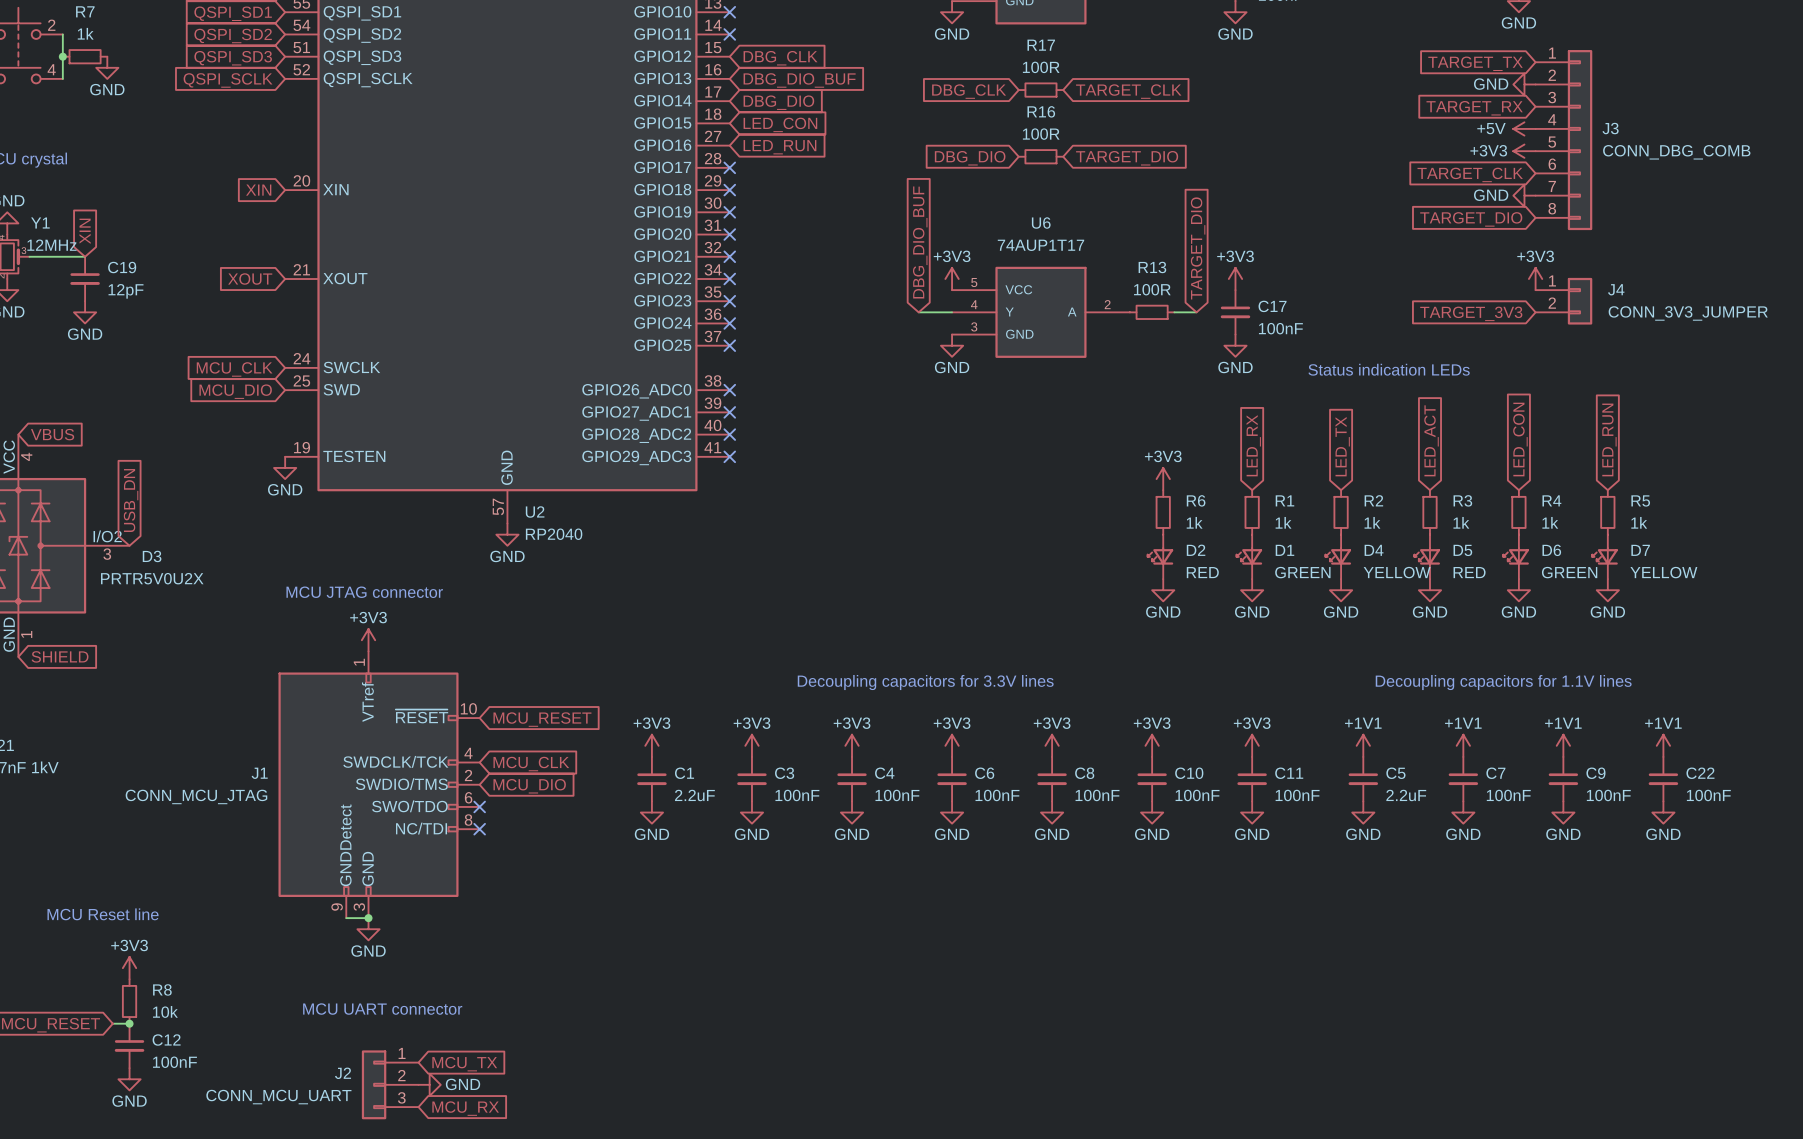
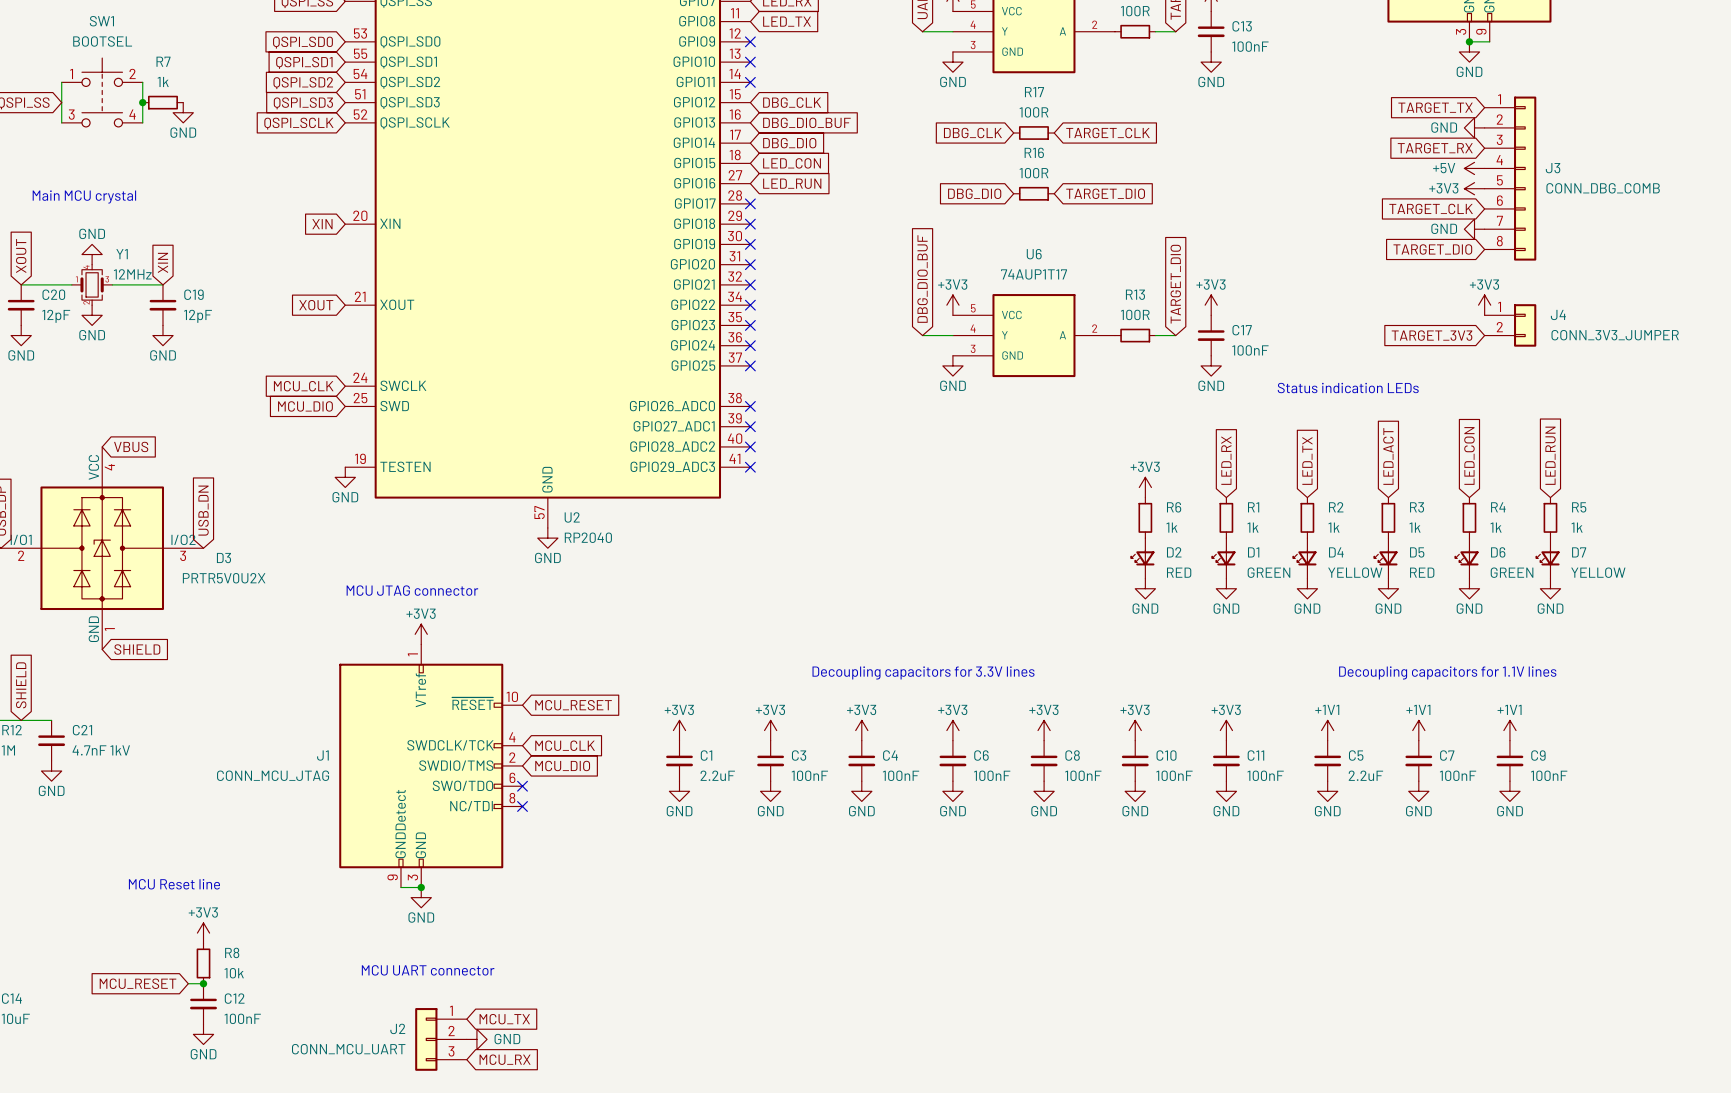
power symbol: +1V1 (1663, 745) -> none
C22: 100nF (1663, 779) -> none
power symbol: GND (1663, 812) -> none

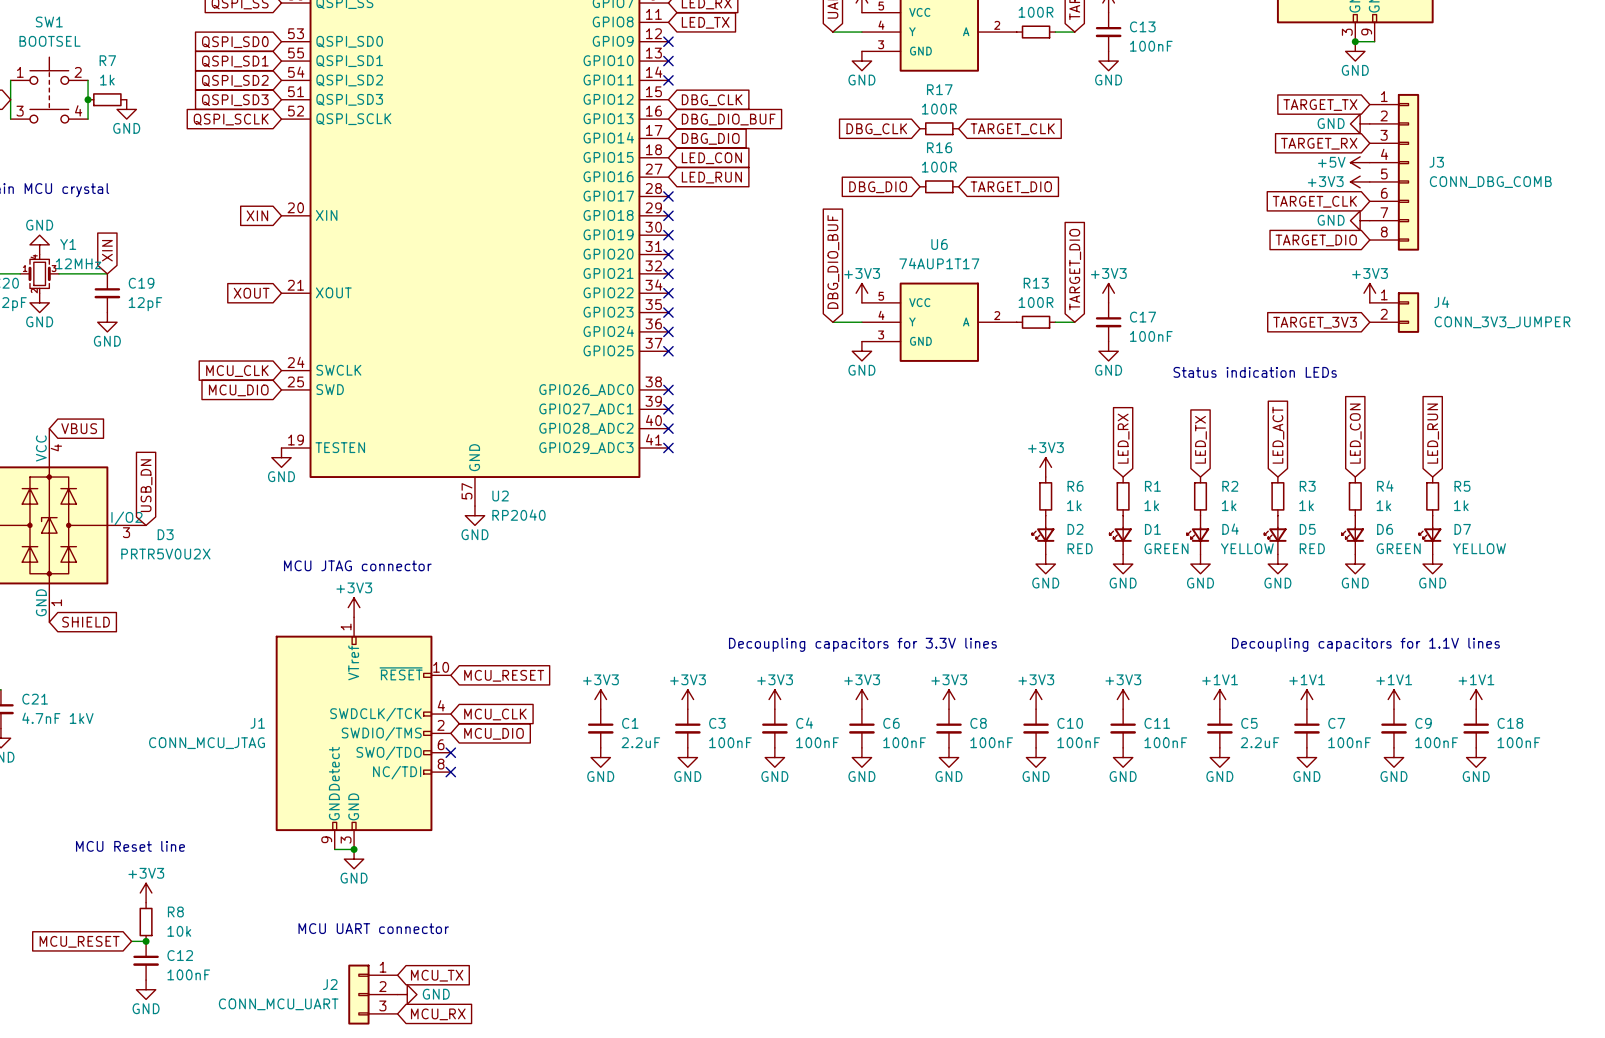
power symbol: none -> +1V1 (1476, 699)
C18: none -> 100nF (1476, 728)
power symbol: none -> GND (1476, 757)

